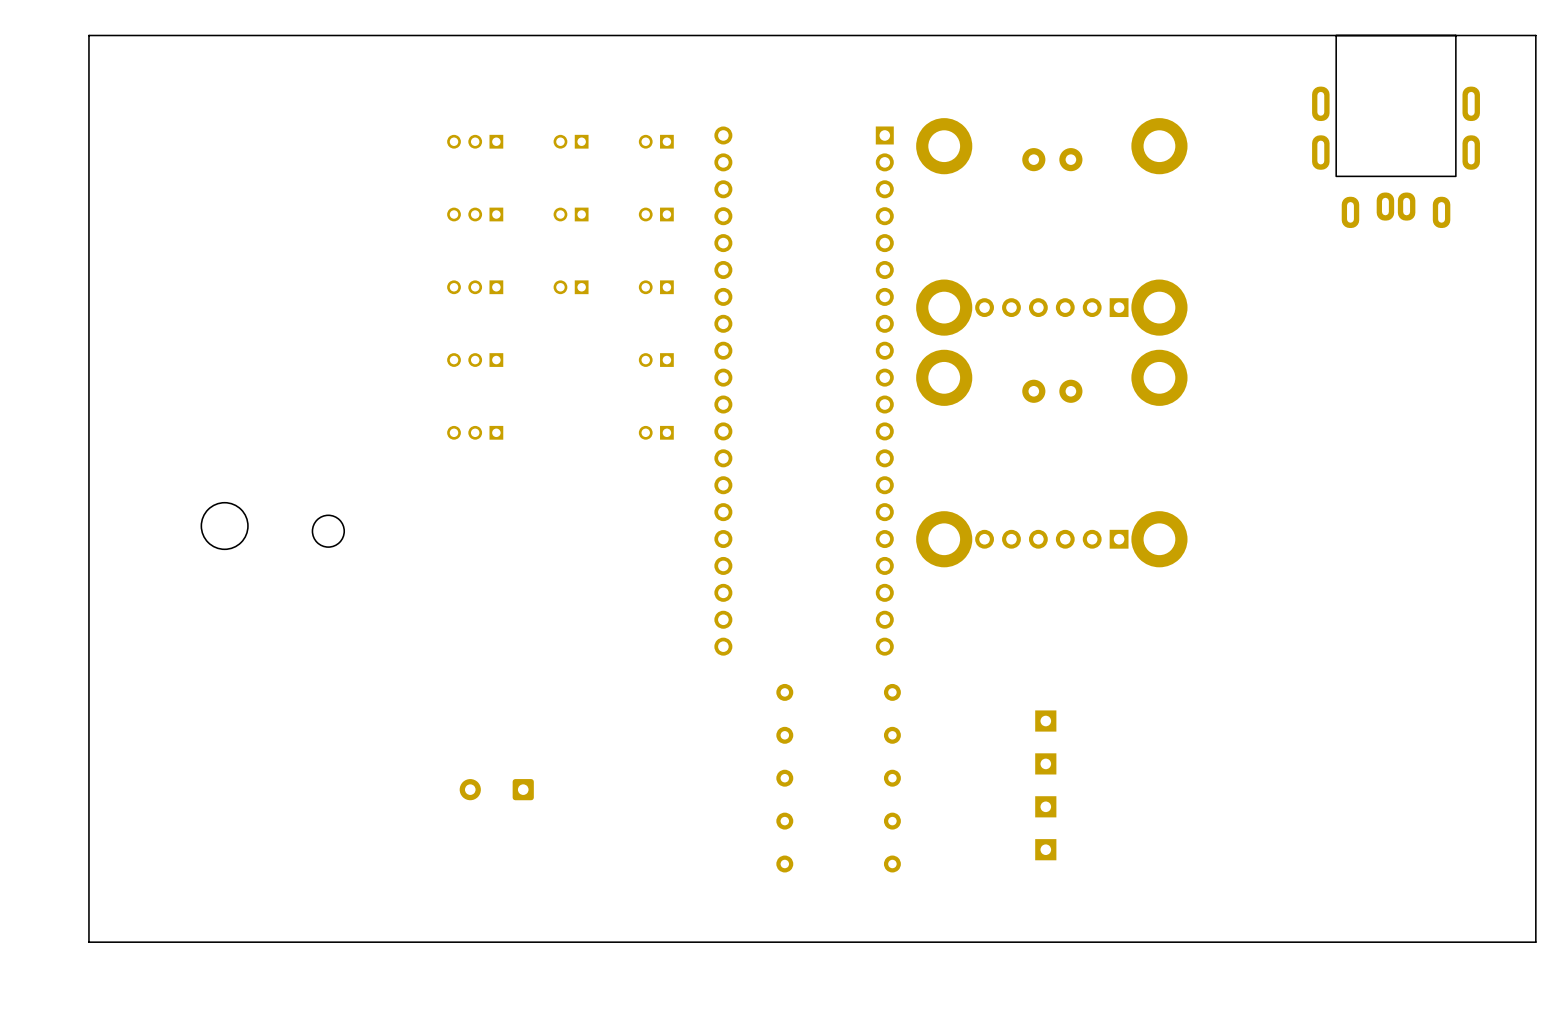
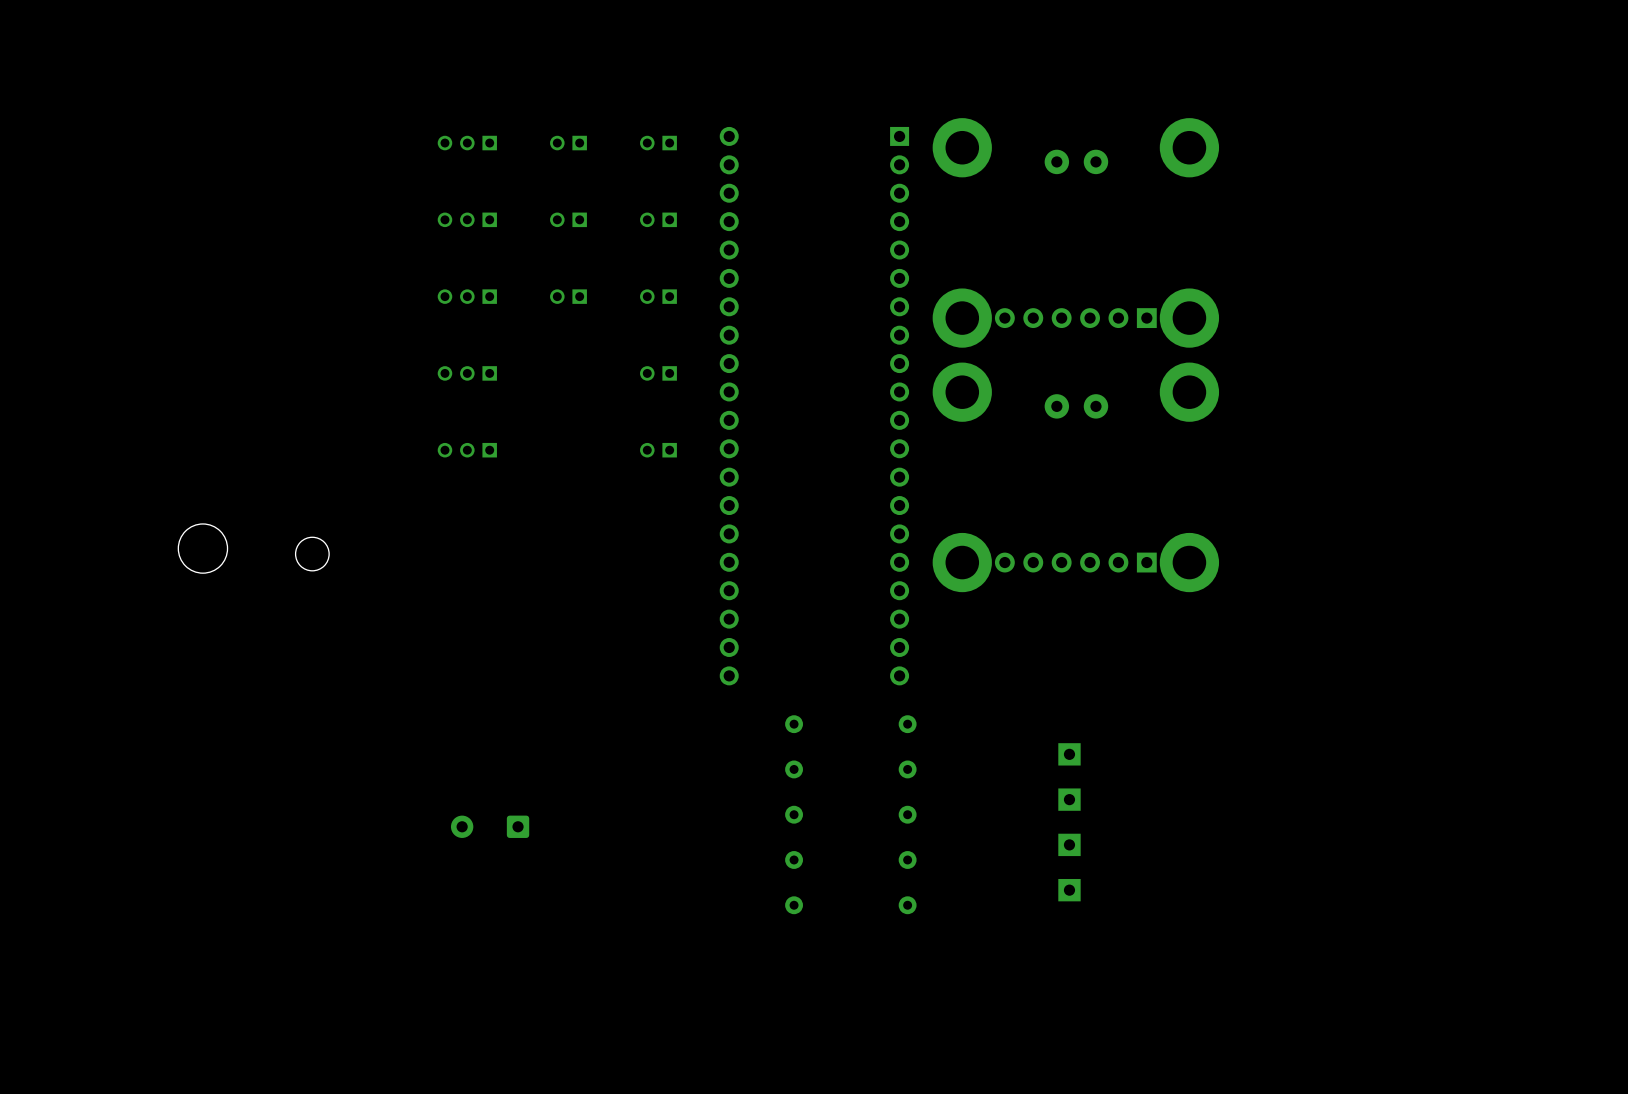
board edge: (1535, 35) (88, 35) (88, 942) (1535, 942) (1535, 35) -> none
part: (1396, 131) -> none

